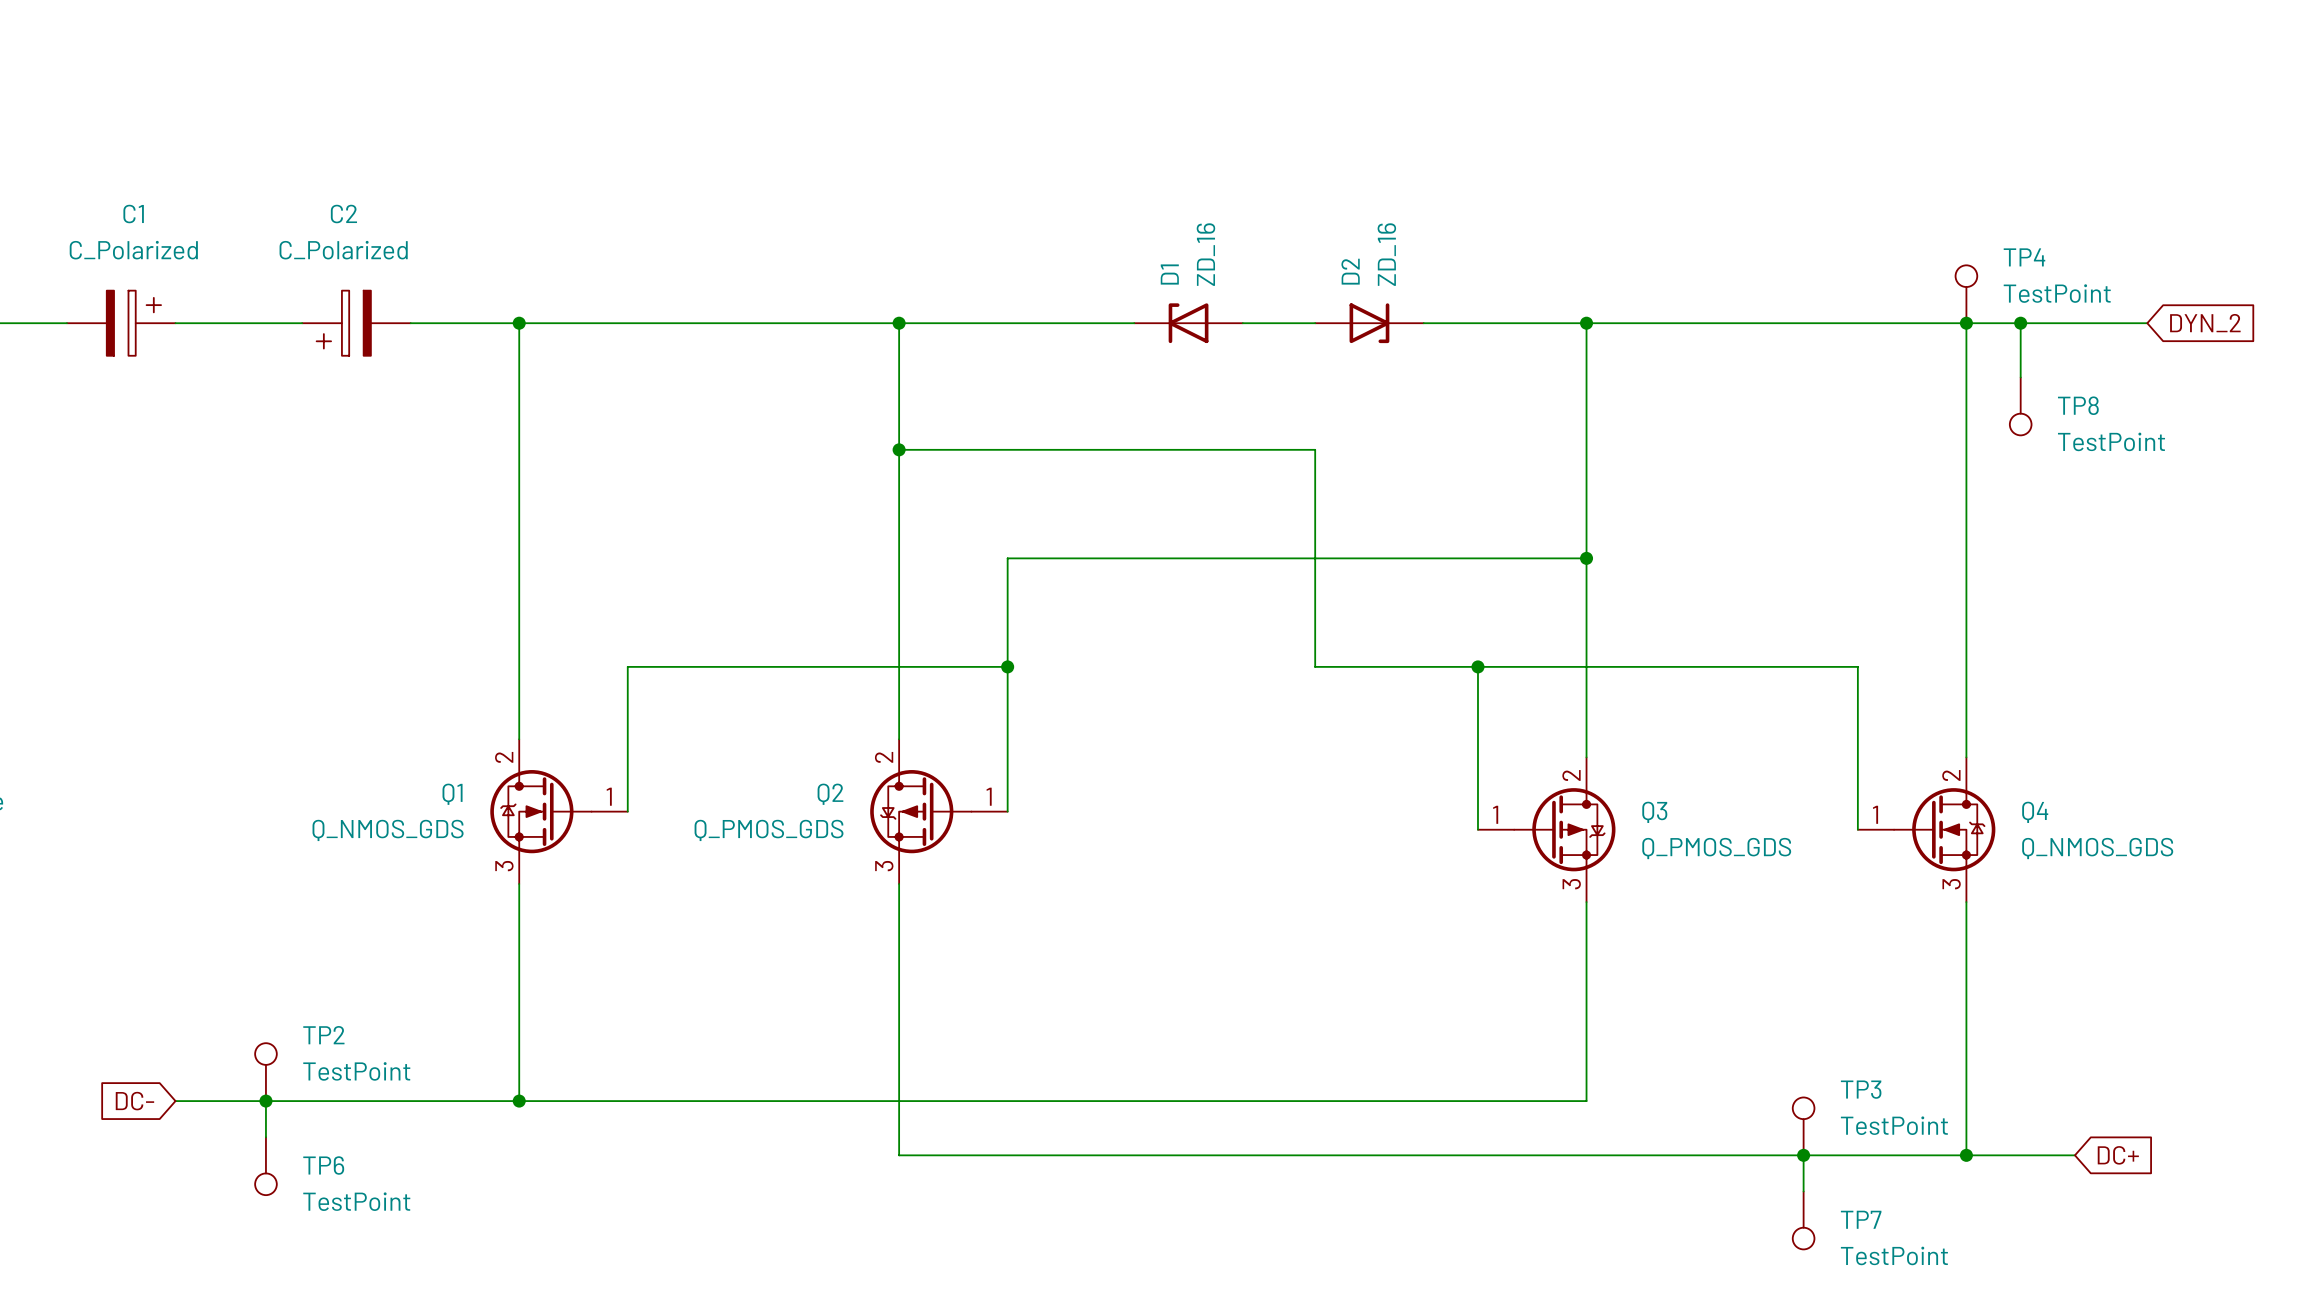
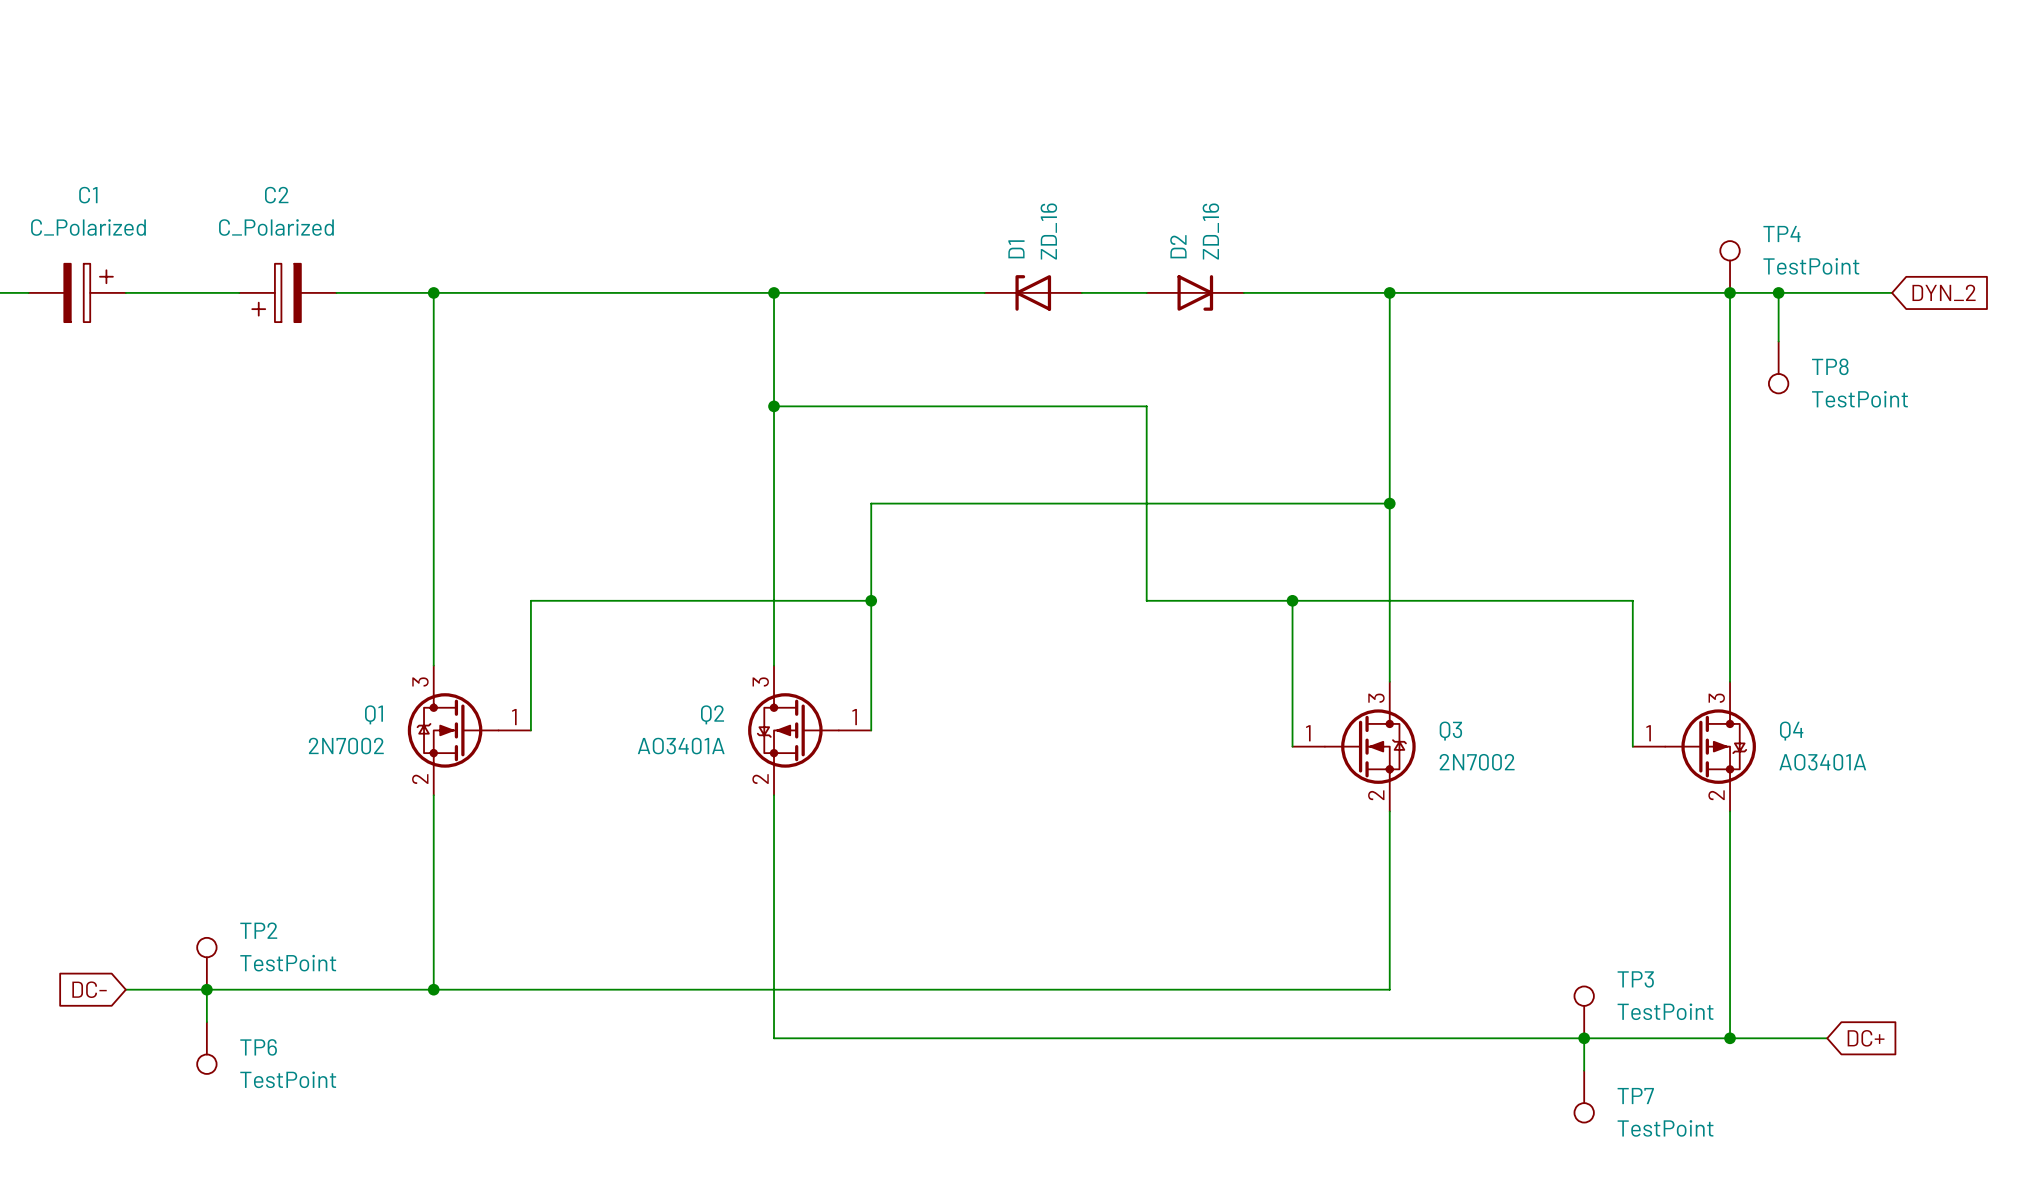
Q1 pin number: 2 (504, 757) -> 3 (420, 682)
Q2 pin number: 2 (884, 757) -> 3 (760, 682)
Q3 symbol: [1477, 757, 1616, 903] -> [1292, 681, 1416, 812]
Q4 symbol: [1857, 757, 1996, 903] -> [1632, 681, 1756, 812]
Q1 value: Q_NMOS_GDS (388, 830) -> 2N7002 (346, 746)
Q2 value: Q_PMOS_GDS (769, 830) -> AO3401A (681, 746)
Q3 value: Q_PMOS_GDS (1716, 848) -> 2N7002 (1477, 762)
Q4 value: Q_NMOS_GDS (2097, 848) -> AO3401A (1822, 762)
Q1 pin number: 3 (504, 866) -> 2 (420, 779)
Q2 pin number: 3 (884, 866) -> 2 (760, 779)

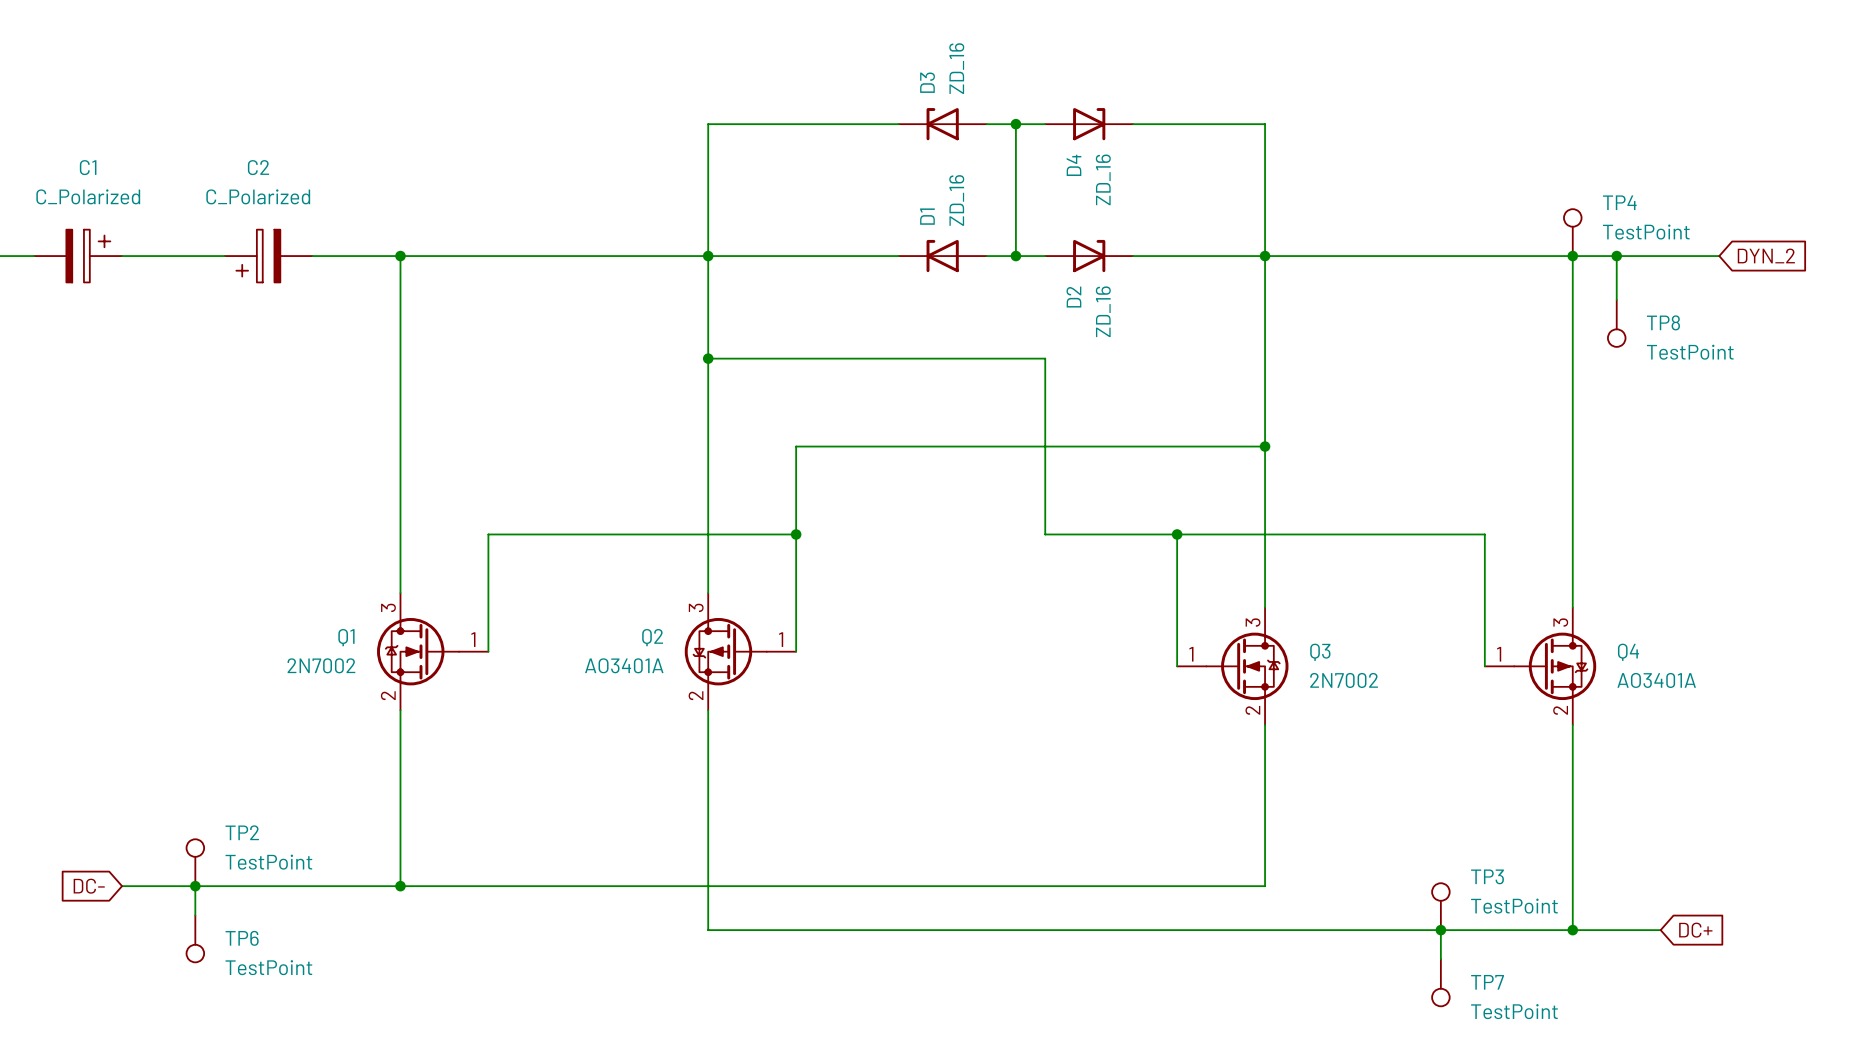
wire: none -> (898, 124) (708, 124) (708, 256)
D3: none -> ZD_16 (942, 124)
wire: none -> (986, 124) (1045, 124)
wire: none -> (1015, 124) (1015, 256)
junction: none -> (1015, 124)
D4: none -> ZD_16 (1089, 124)
wire: none -> (1133, 124) (1265, 124) (1265, 256)
junction: none -> (1015, 256)
D2 flip: as is (1195, 292) -> up-down (1089, 256)

